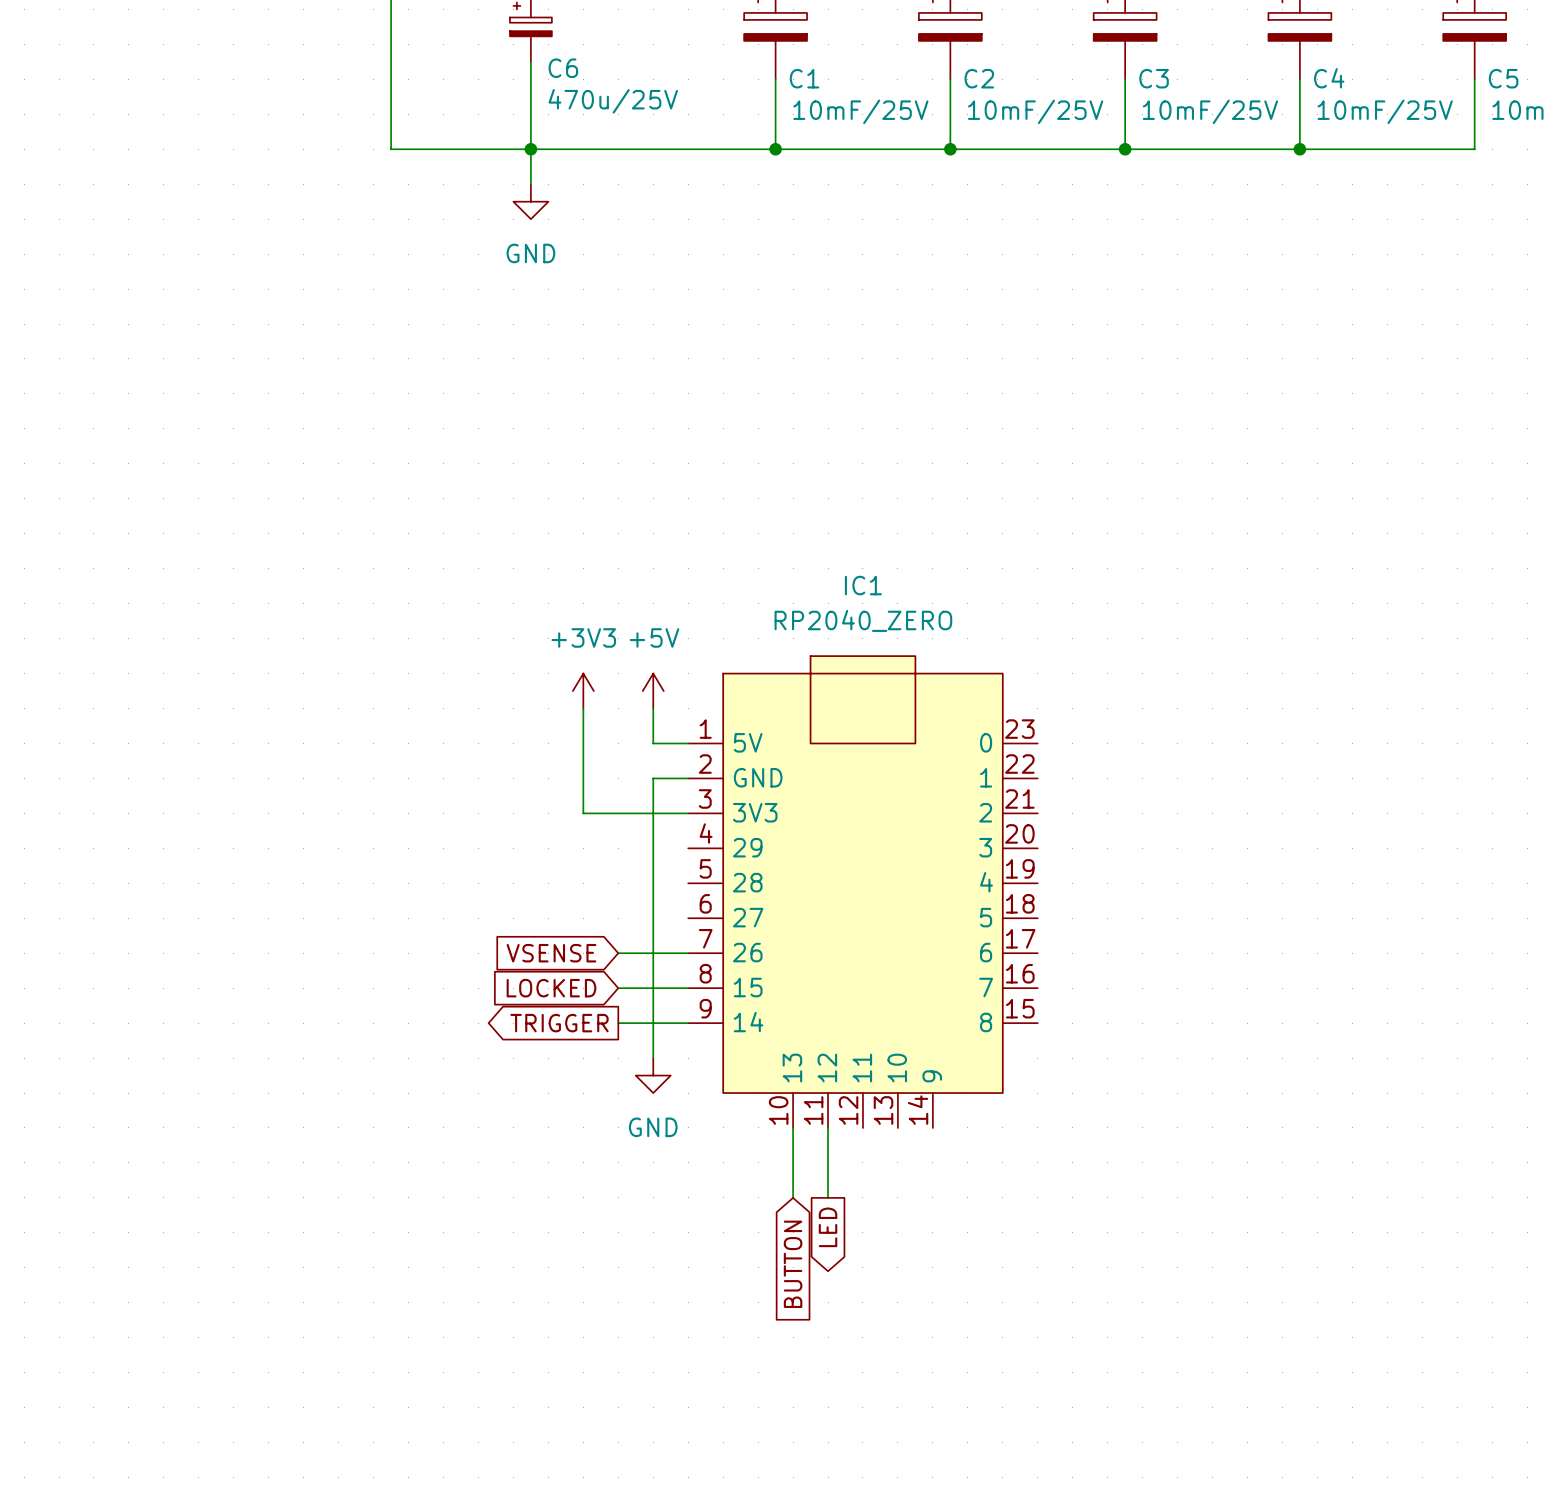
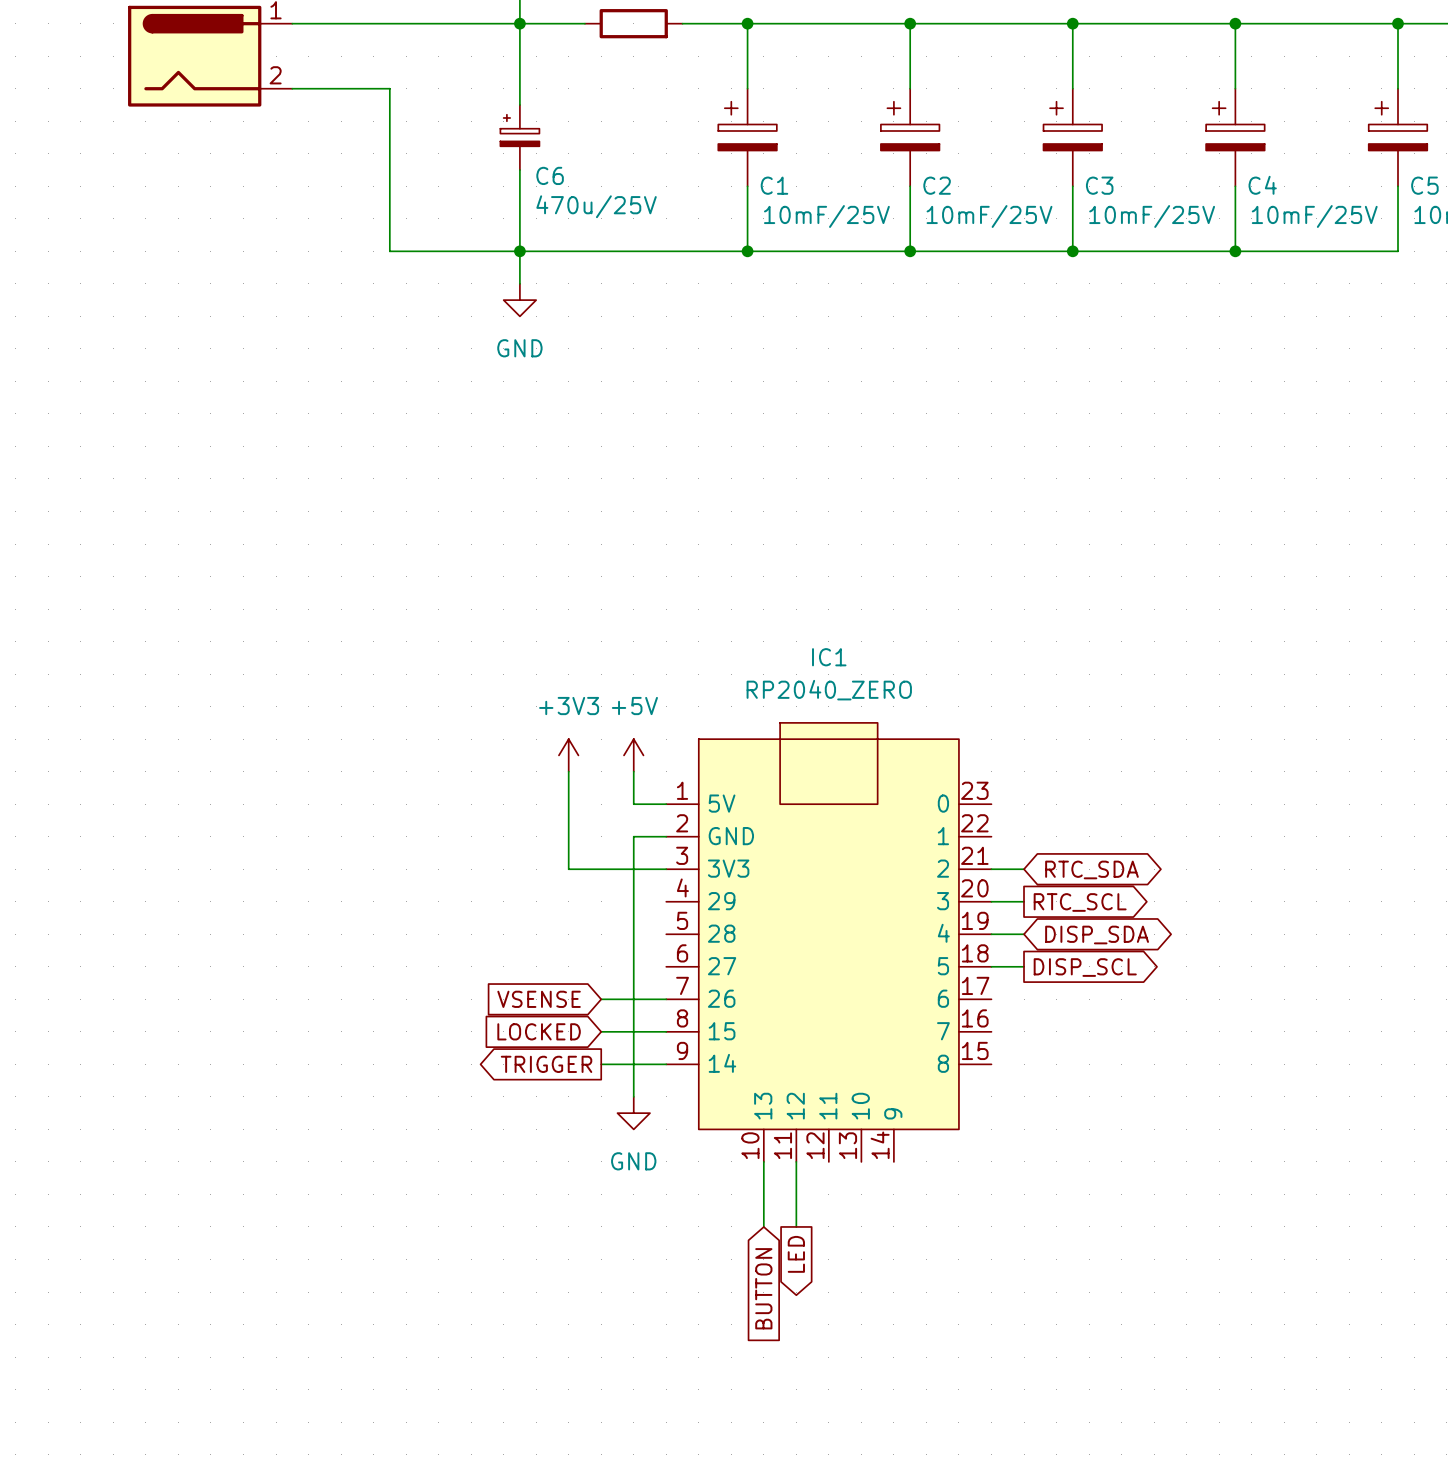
wire: none -> (991, 869) (1024, 869)
global label: none -> RTC_SDA (1091, 869)
wire: none -> (991, 901) (1024, 901)
global label: none -> RTC_SCL (1080, 902)
wire: none -> (991, 934) (1024, 934)
global label: none -> DISP_SDA (1097, 935)
wire: none -> (991, 966) (1024, 966)
global label: none -> DISP_SCL (1085, 967)

